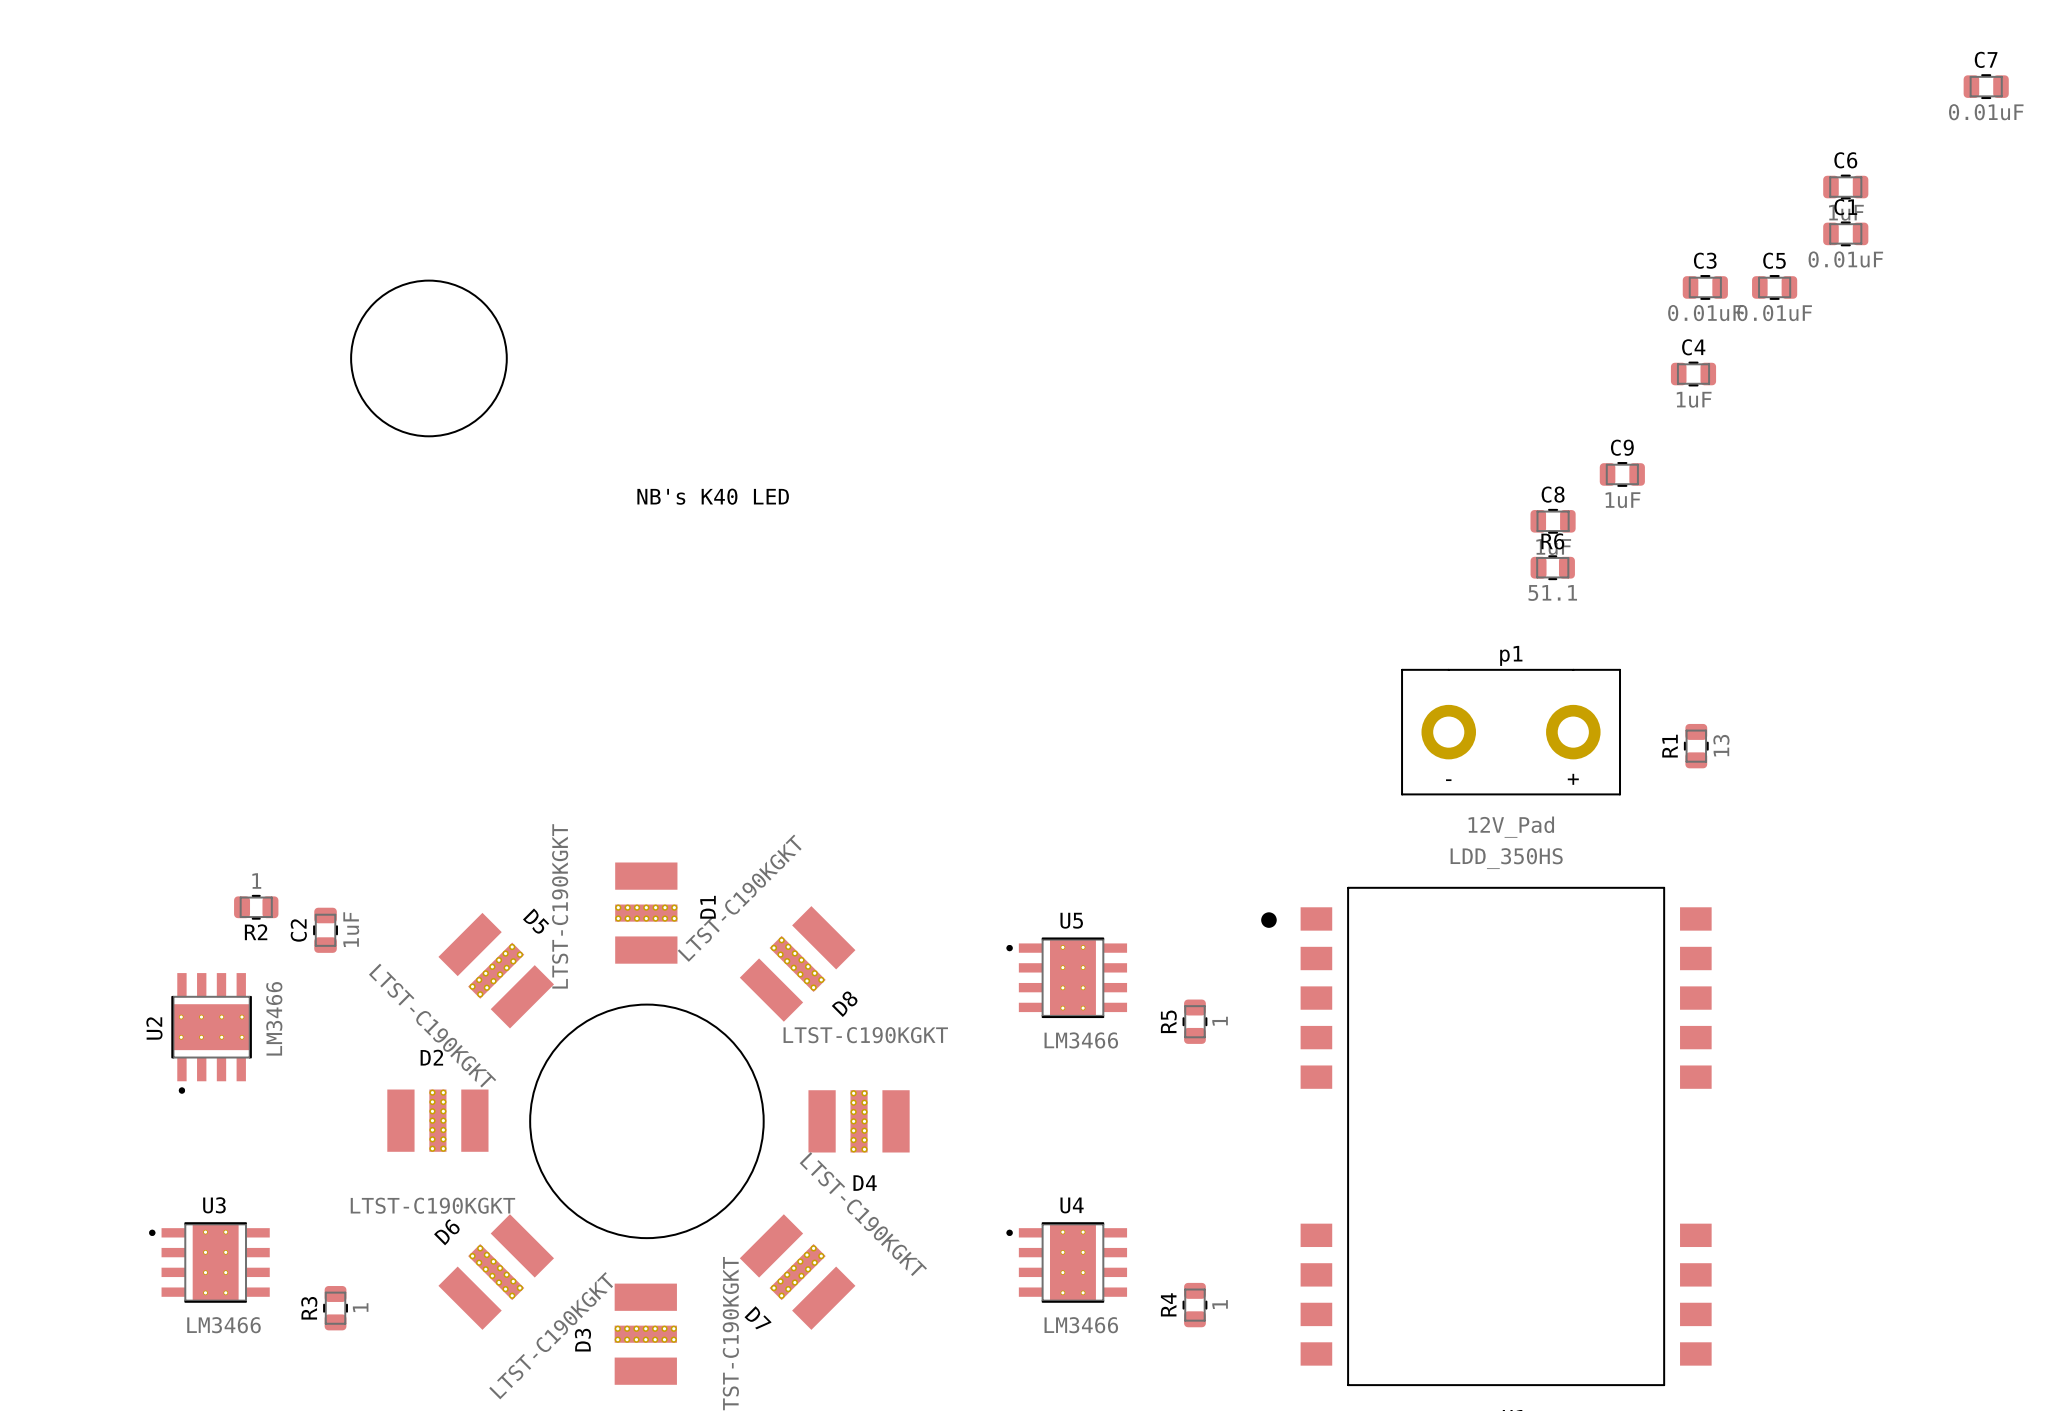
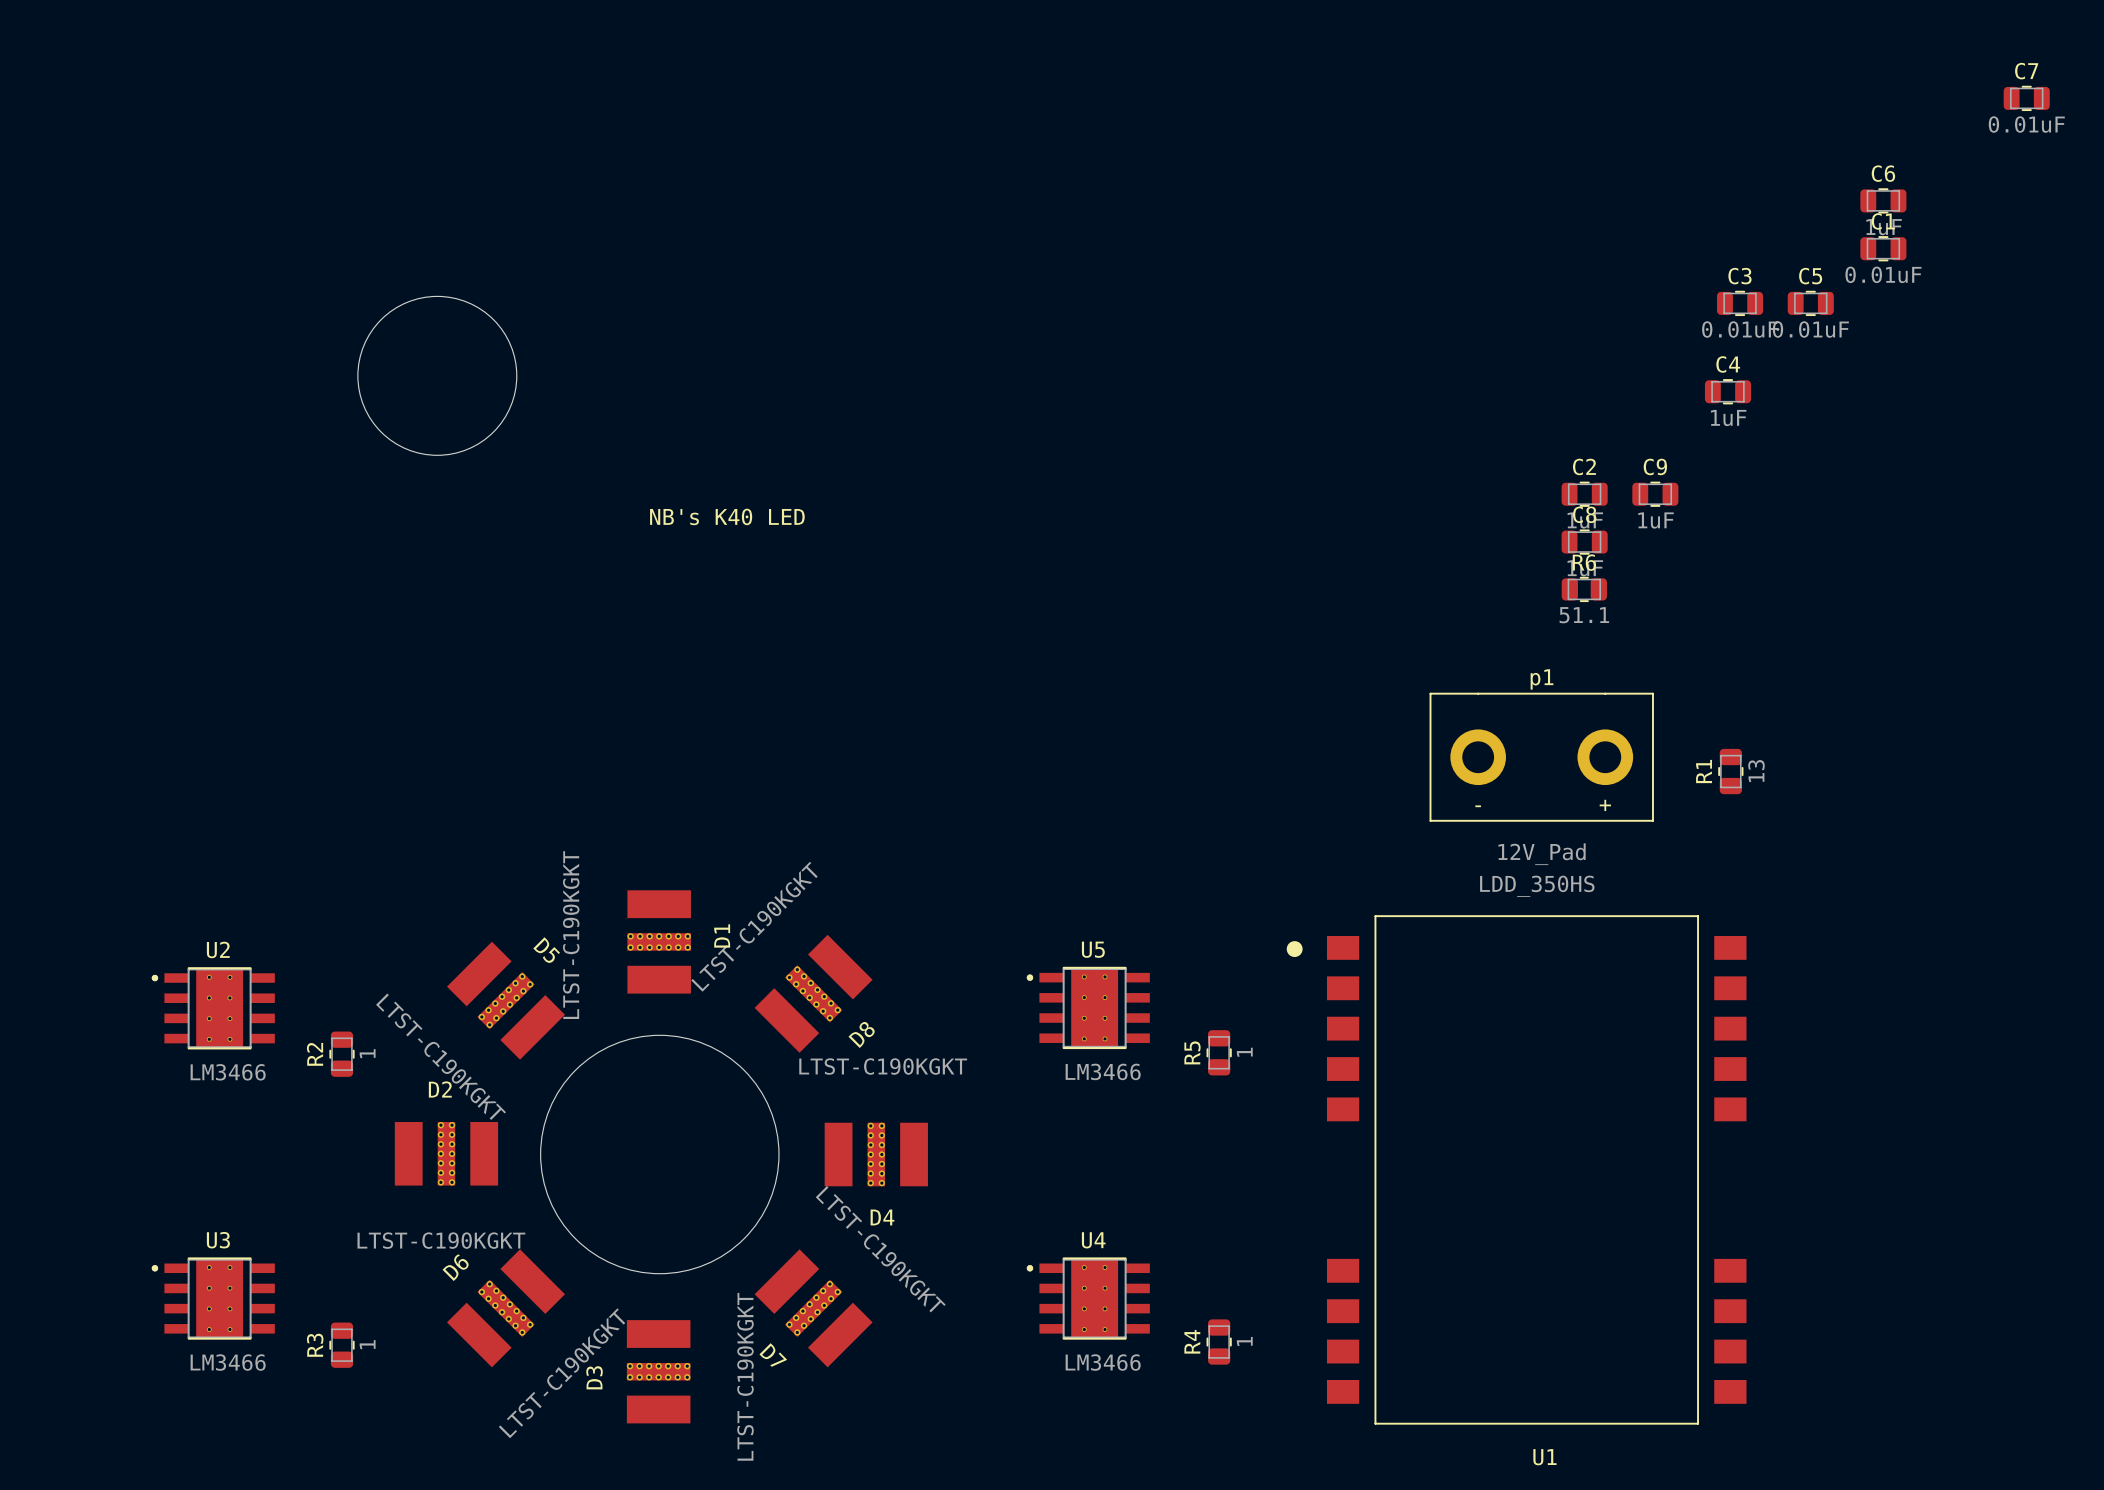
R2 rotation: 0° (256, 907) -> 90° clockwise (341, 1054)
R2 position: (256, 907) -> (341, 1054)
C2 rotation: 0° (325, 930) -> 90° clockwise (1584, 494)
C2 position: (325, 930) -> (1584, 494)
U2 rotation: 0° (211, 1033) -> 90° clockwise (213, 1008)

